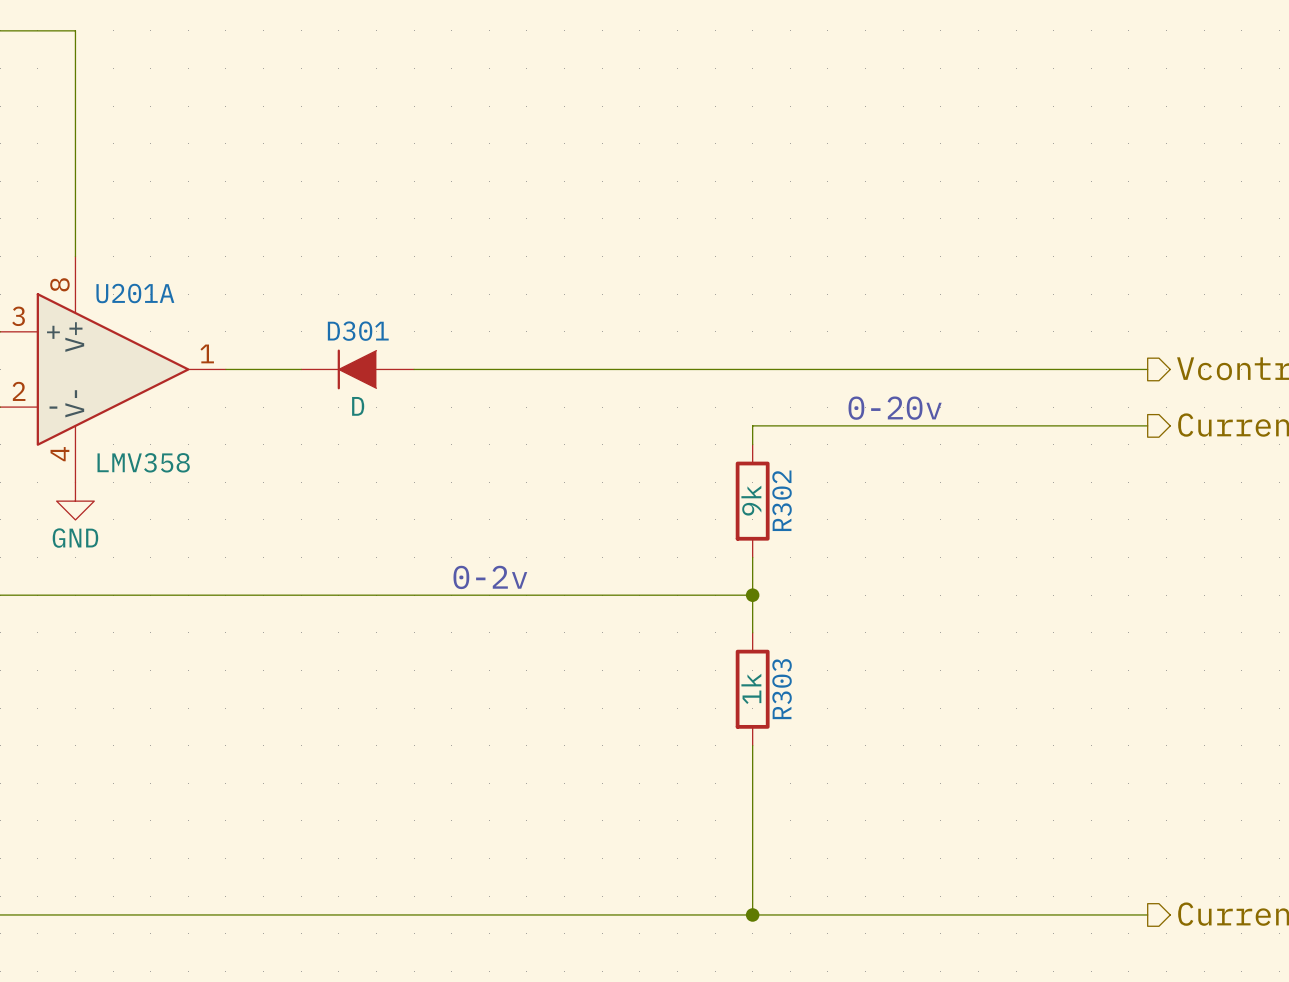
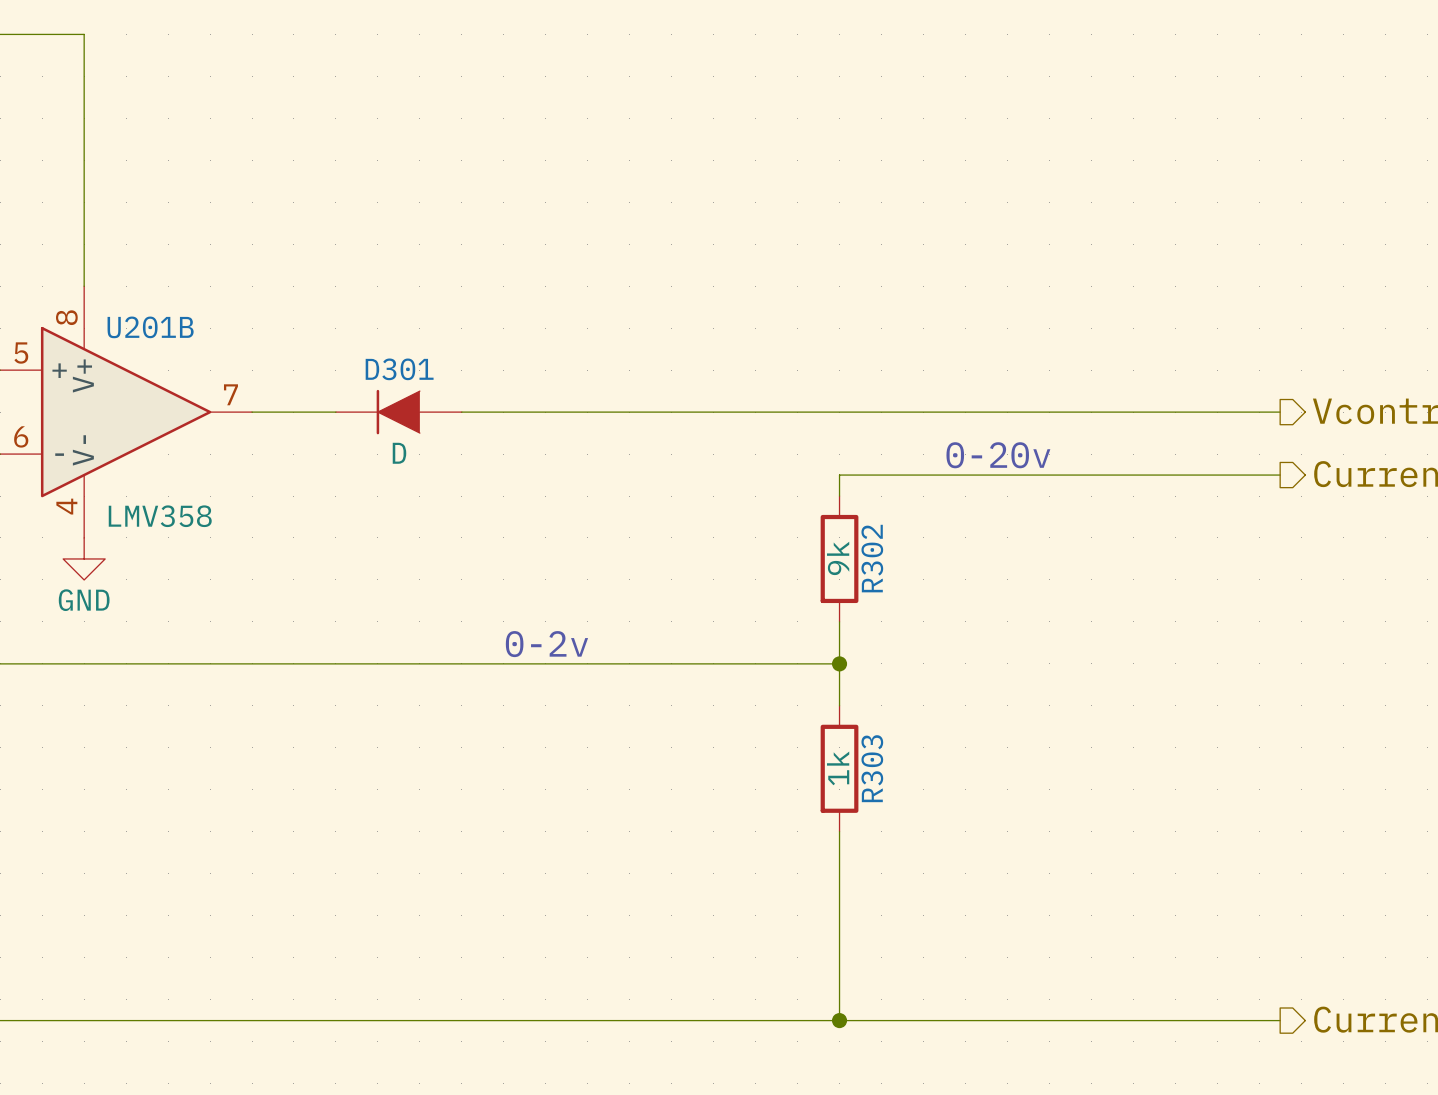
U201A name: U201A (135, 293) -> U201B (150, 327)
U201A pin number: 3 (18, 316) -> 5 (21, 353)
U201A pin number: 1 (207, 353) -> 7 (230, 394)
U201A pin number: 2 (19, 391) -> 6 (21, 436)

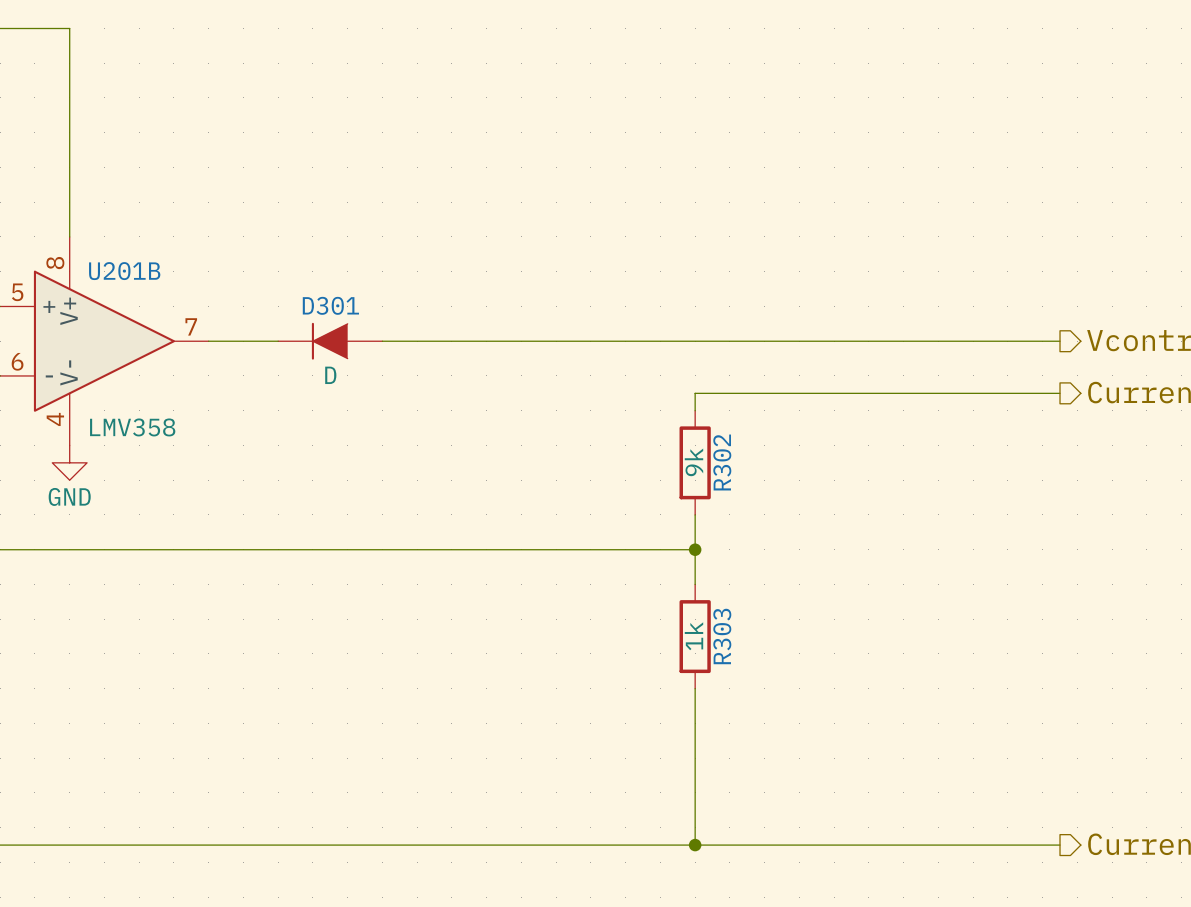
text: 0-20v (998, 455) -> none
text: 0-2v (546, 644) -> none

